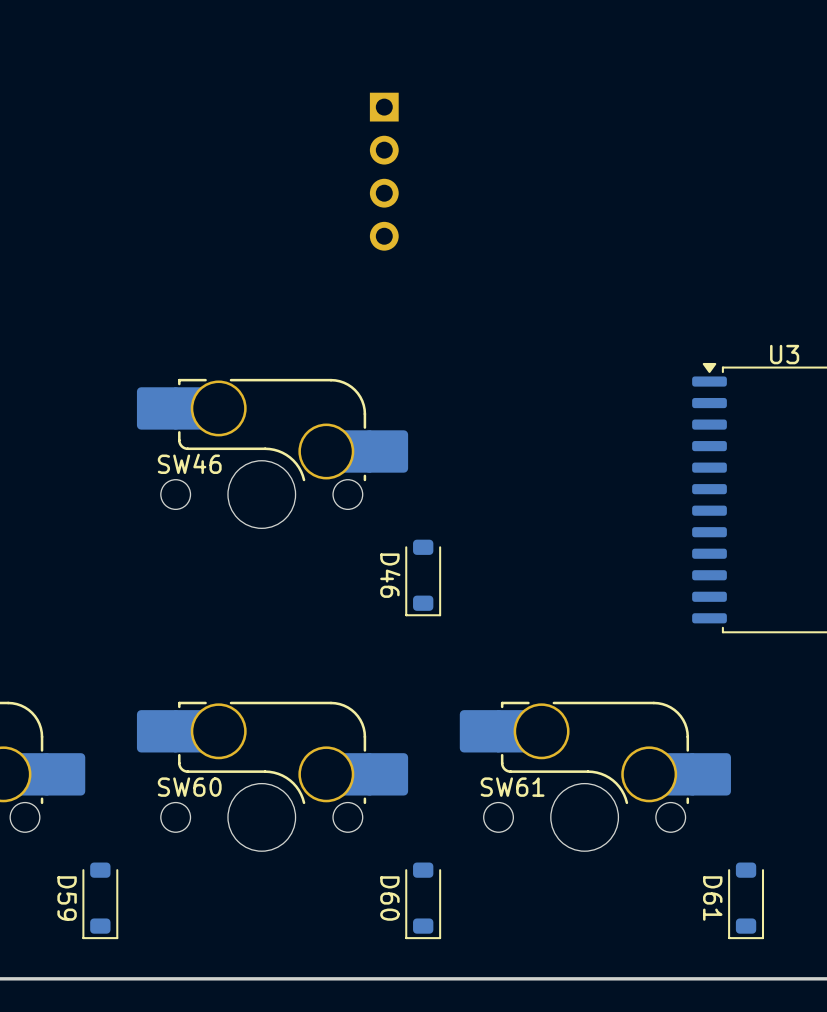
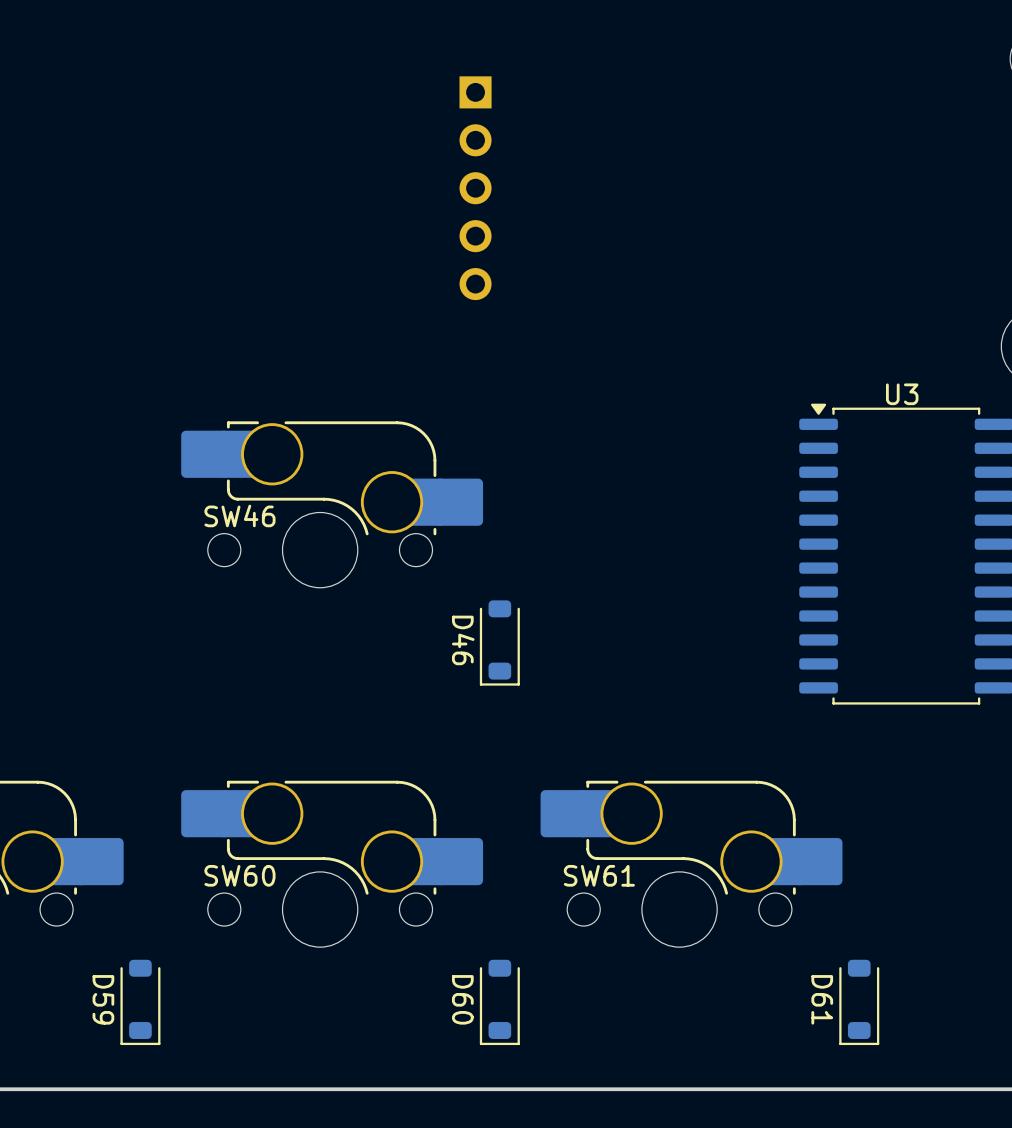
part: none -> (475, 188)
part: (384, 171) -> none

